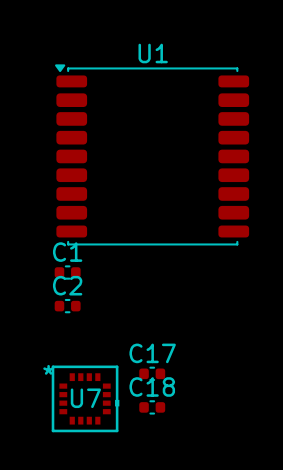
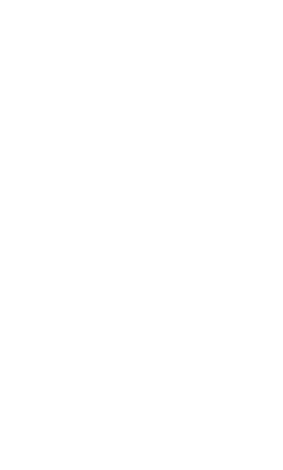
U1: (152, 154) -> none
C1: (67, 272) -> none
C2: (67, 306) -> none
C17: (152, 373) -> none
U7: (85, 398) -> none
C18: (152, 407) -> none

